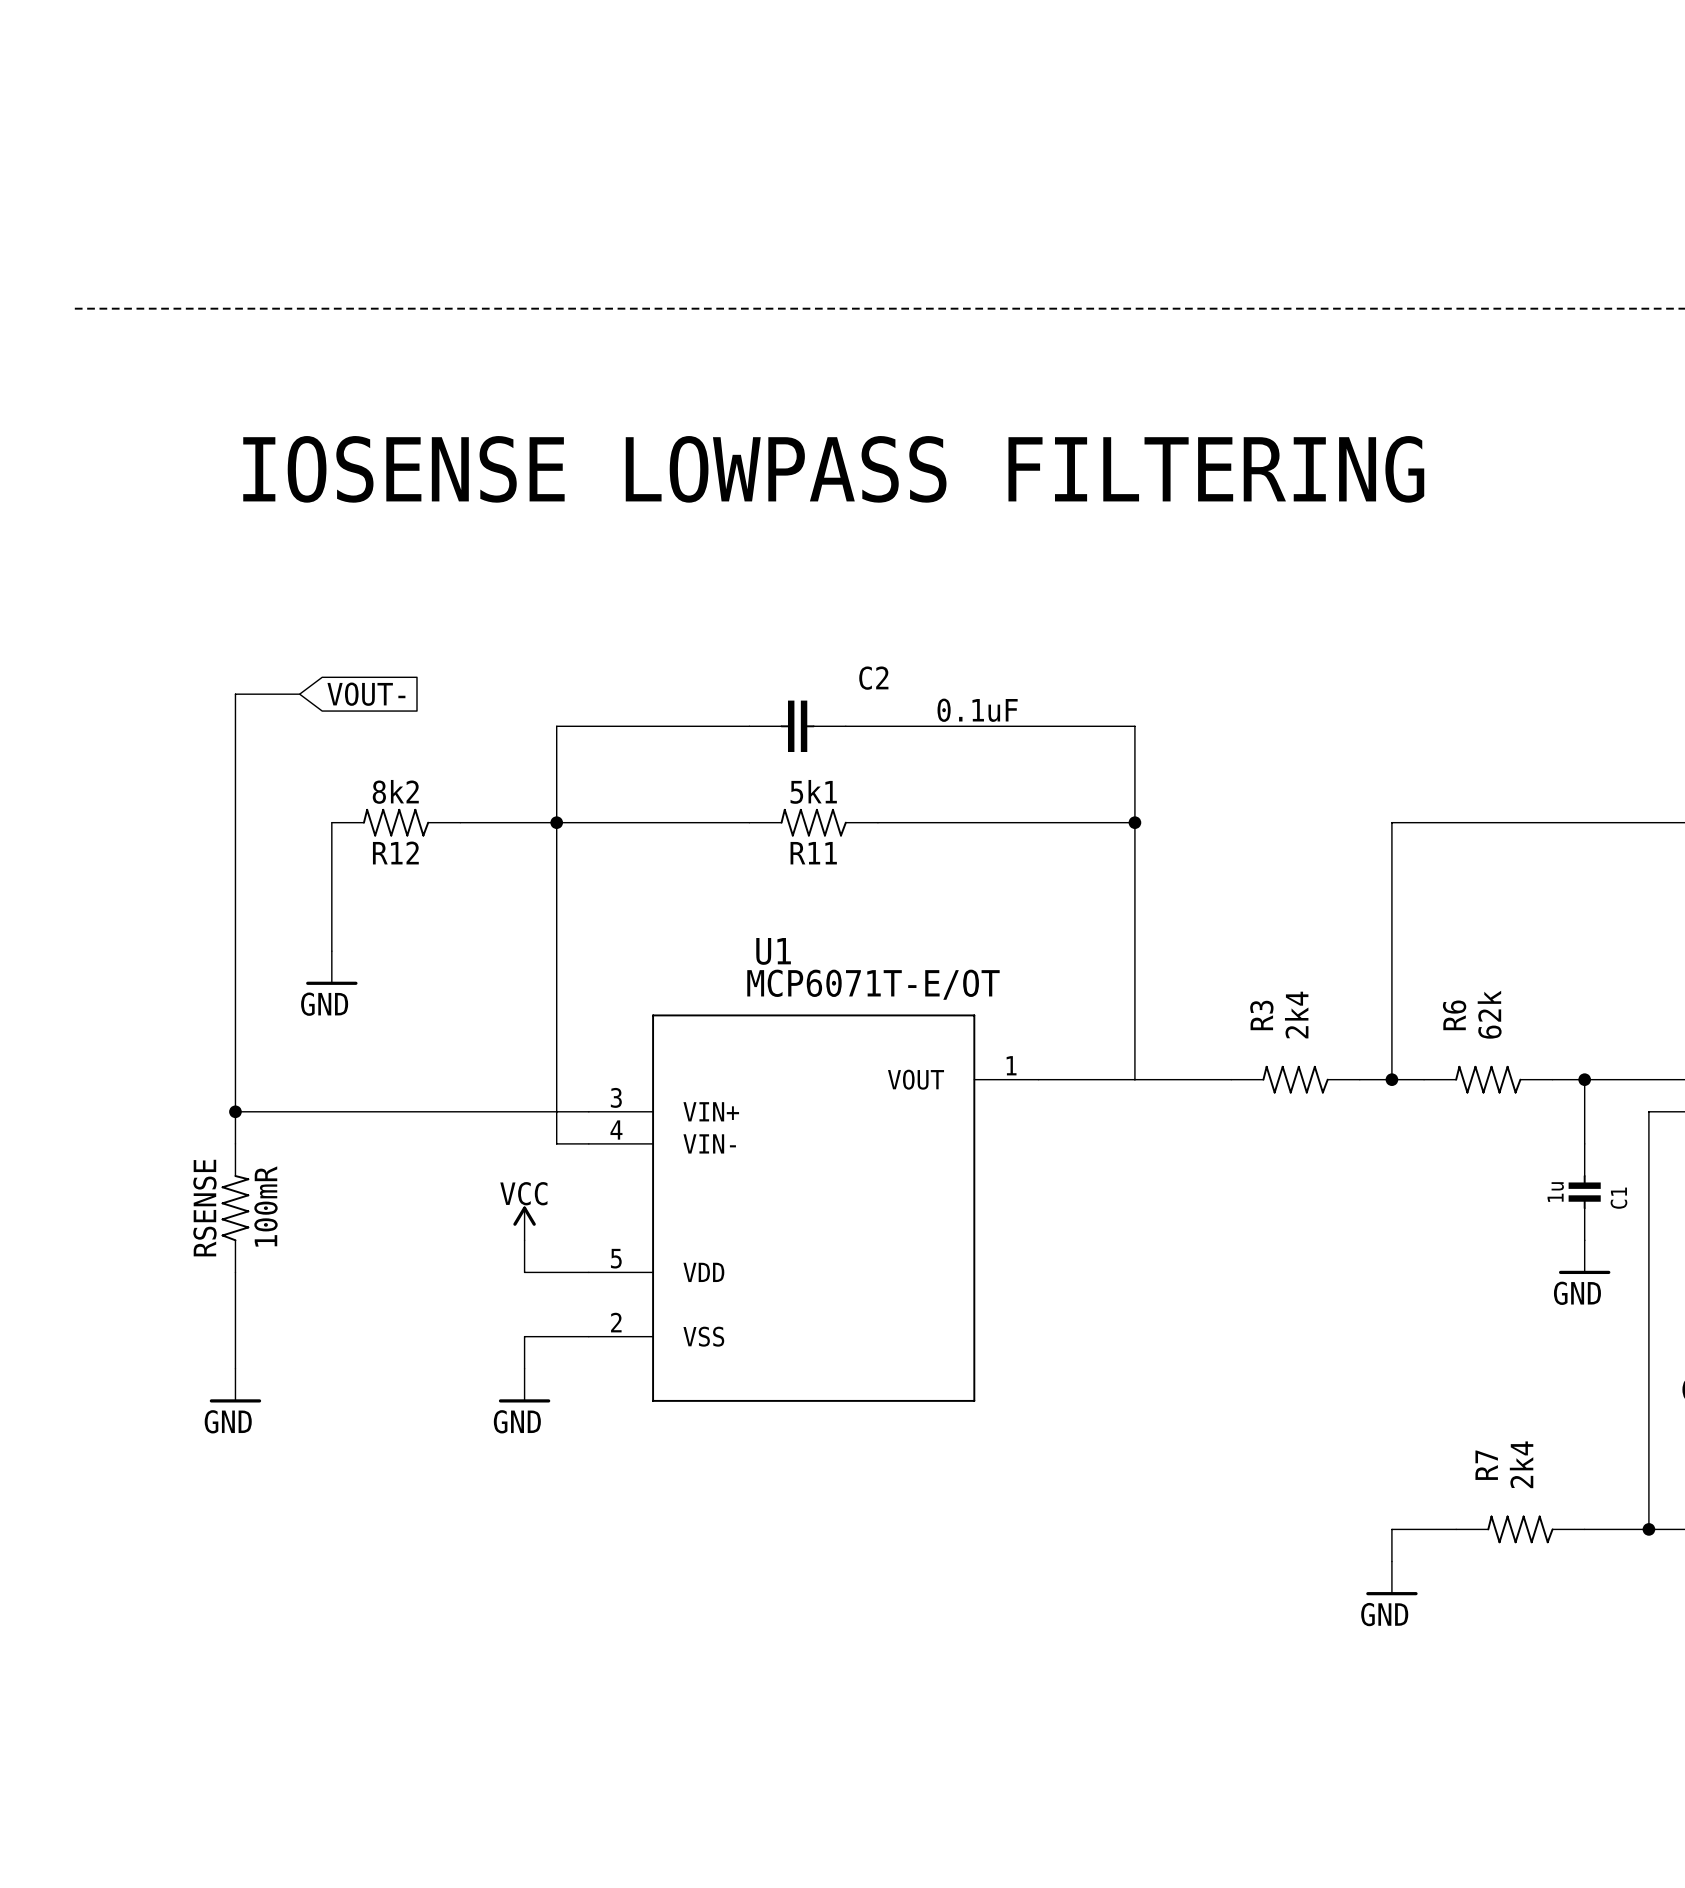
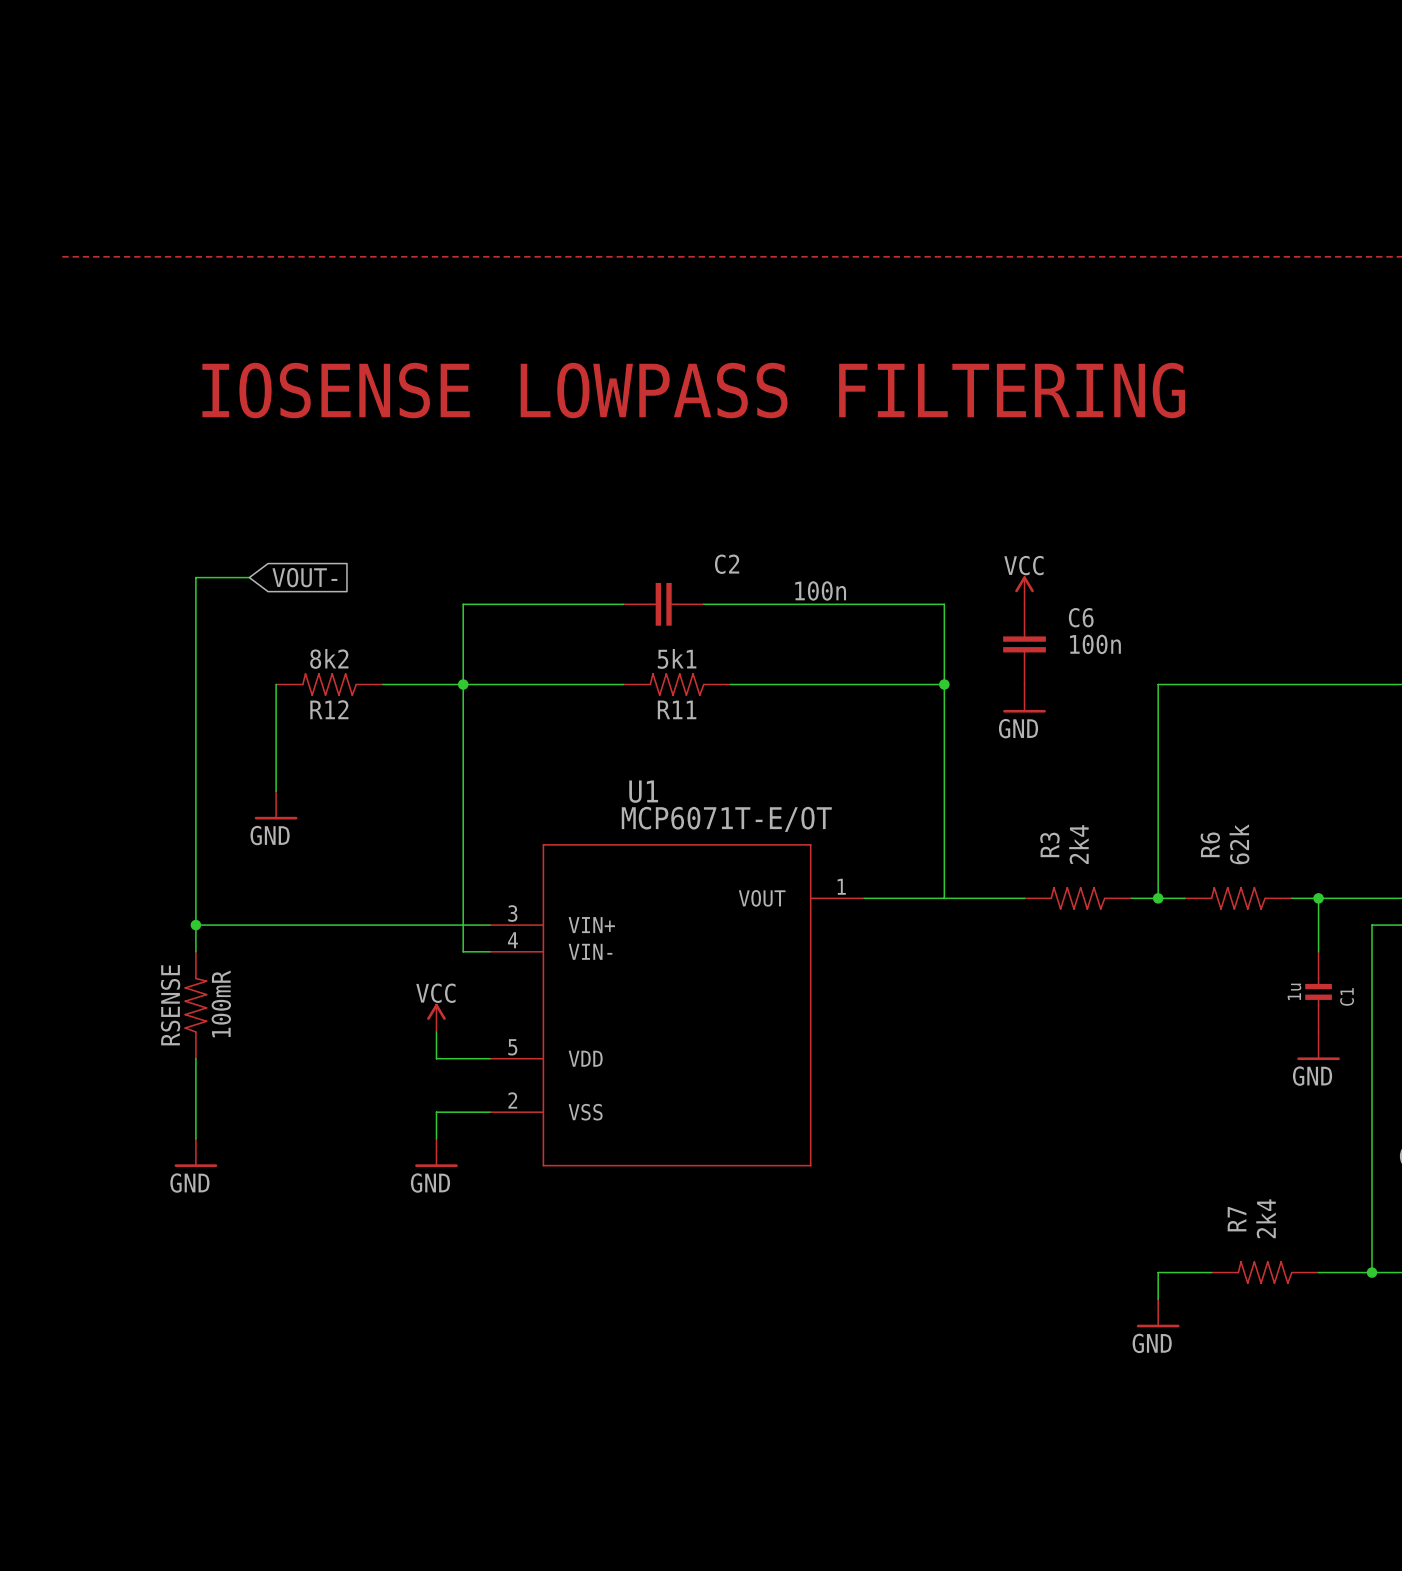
power symbol: none -> VCC (1024, 590)
C2 value: 0.1uF (977, 710) -> 100n (820, 590)
C6: none -> 100n (1024, 644)
power symbol: none -> GND (1024, 698)

